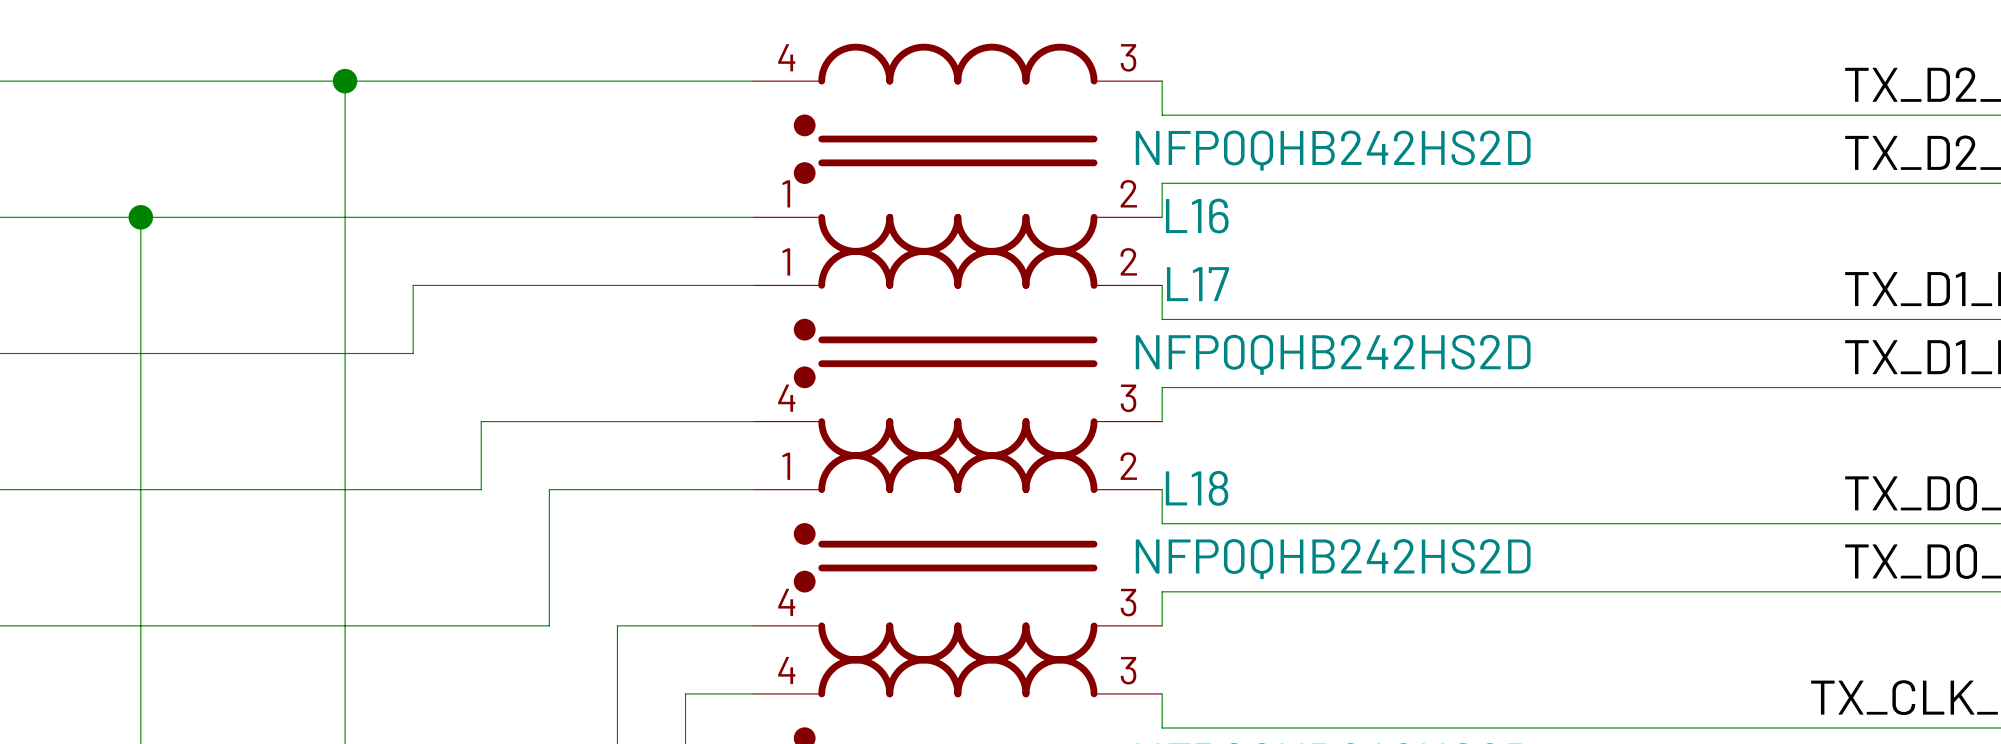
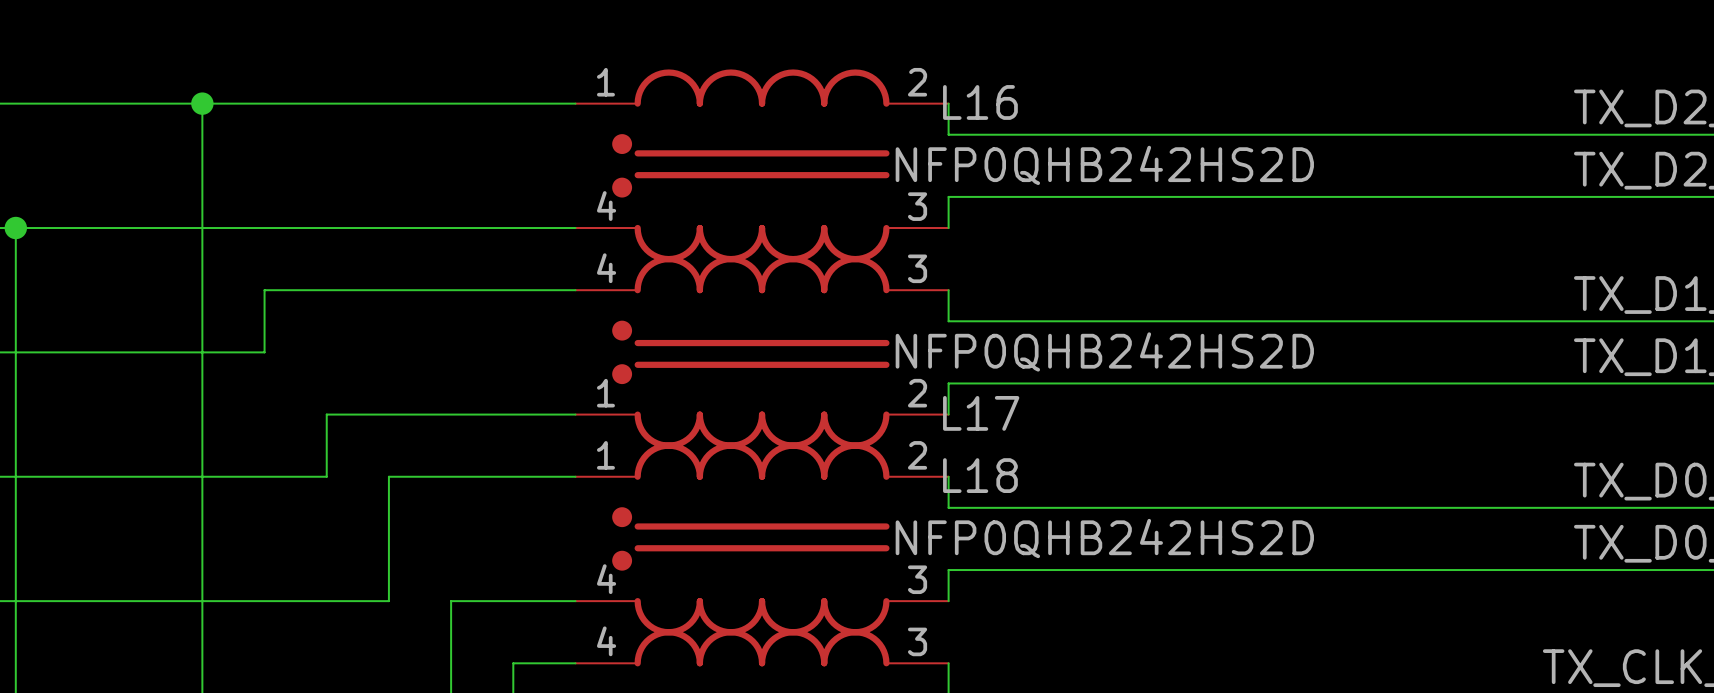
L16 flip: as is (945, 149) -> up-down (750, 165)
L17 flip: as is (945, 353) -> up-down (750, 352)

